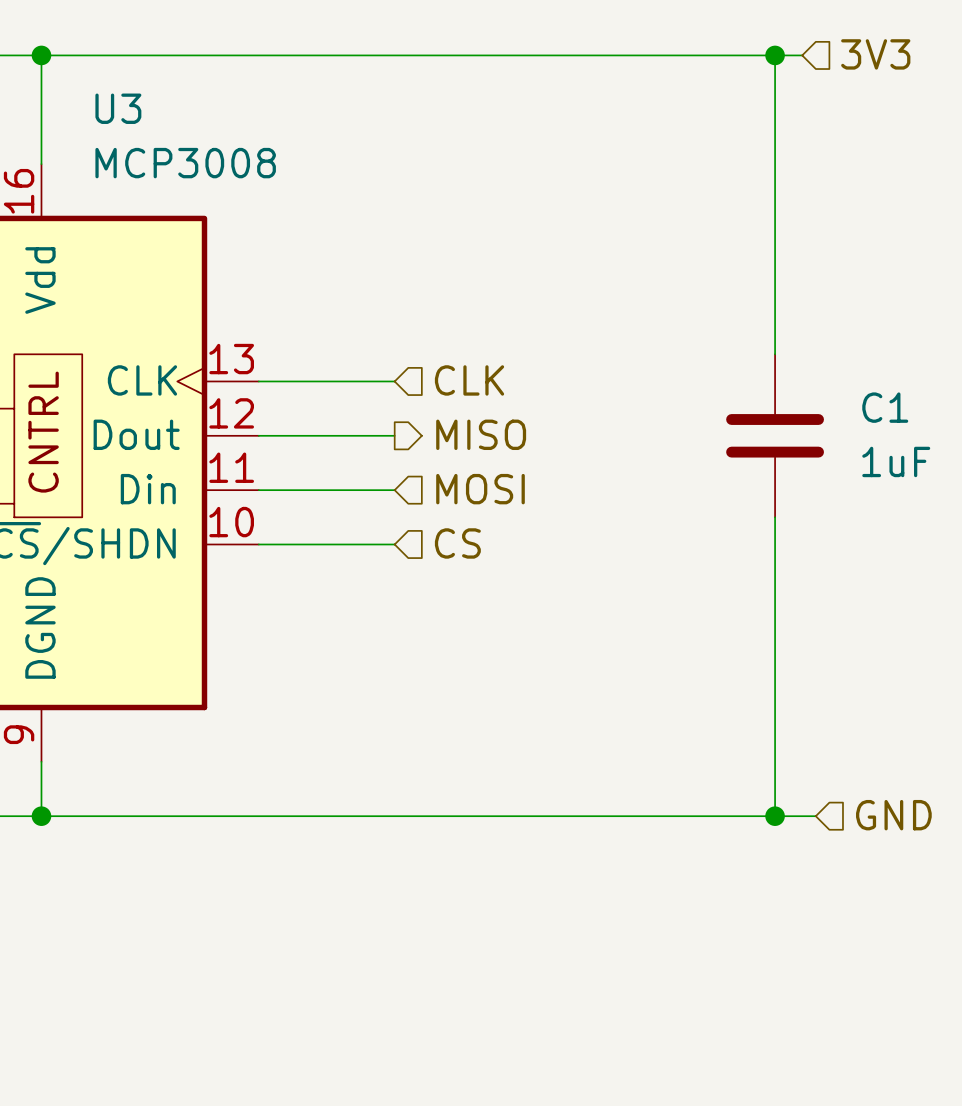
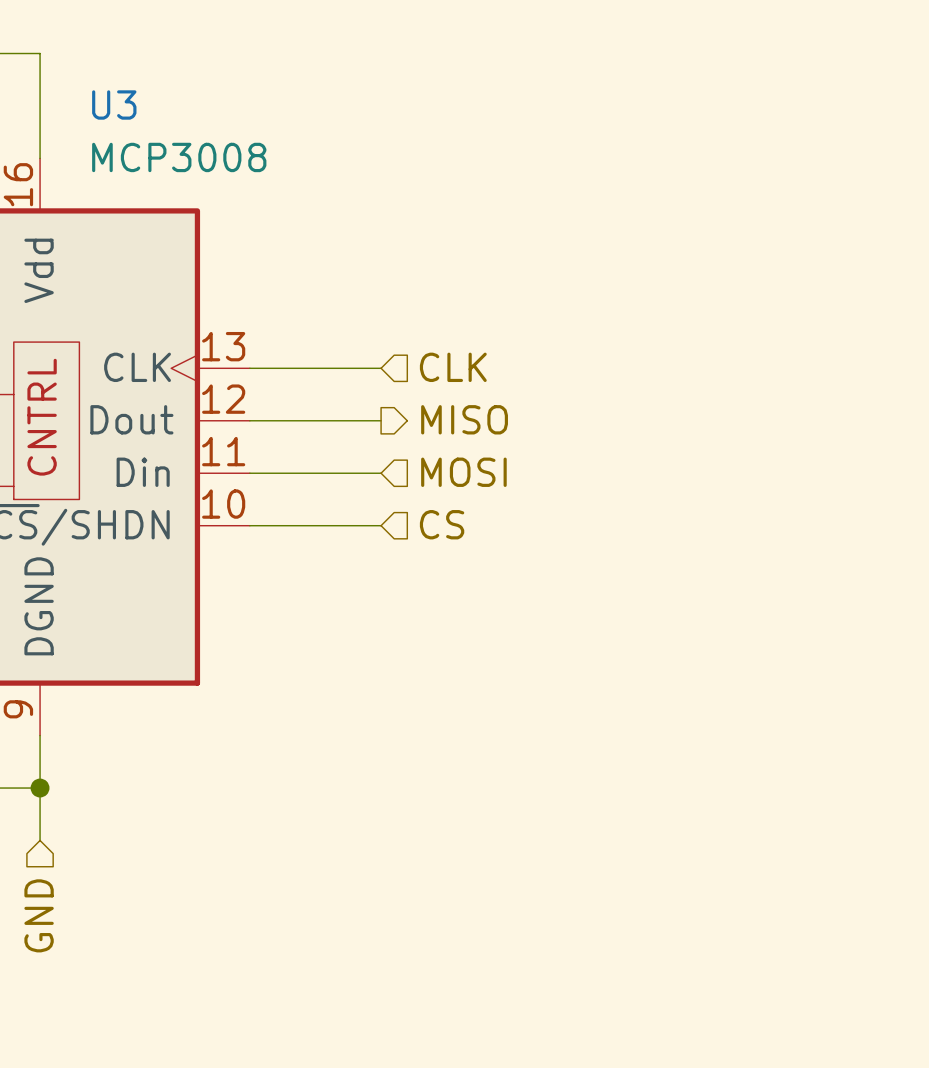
hierarchical label: 3V3 (875, 54) -> none
wire: (41, 55) (802, 55) -> none
junction: (41, 55) -> none
wire: (775, 55) (775, 354) -> none
junction: (775, 55) -> none
C1: 1uF (775, 435) -> none
wire: (775, 517) (775, 816) -> none
hierarchical label: GND (893, 815) -> none
wire: (41, 816) (815, 816) -> (40, 788) (40, 840)
junction: (775, 816) -> none
hierarchical label: none -> GND (39, 915)

